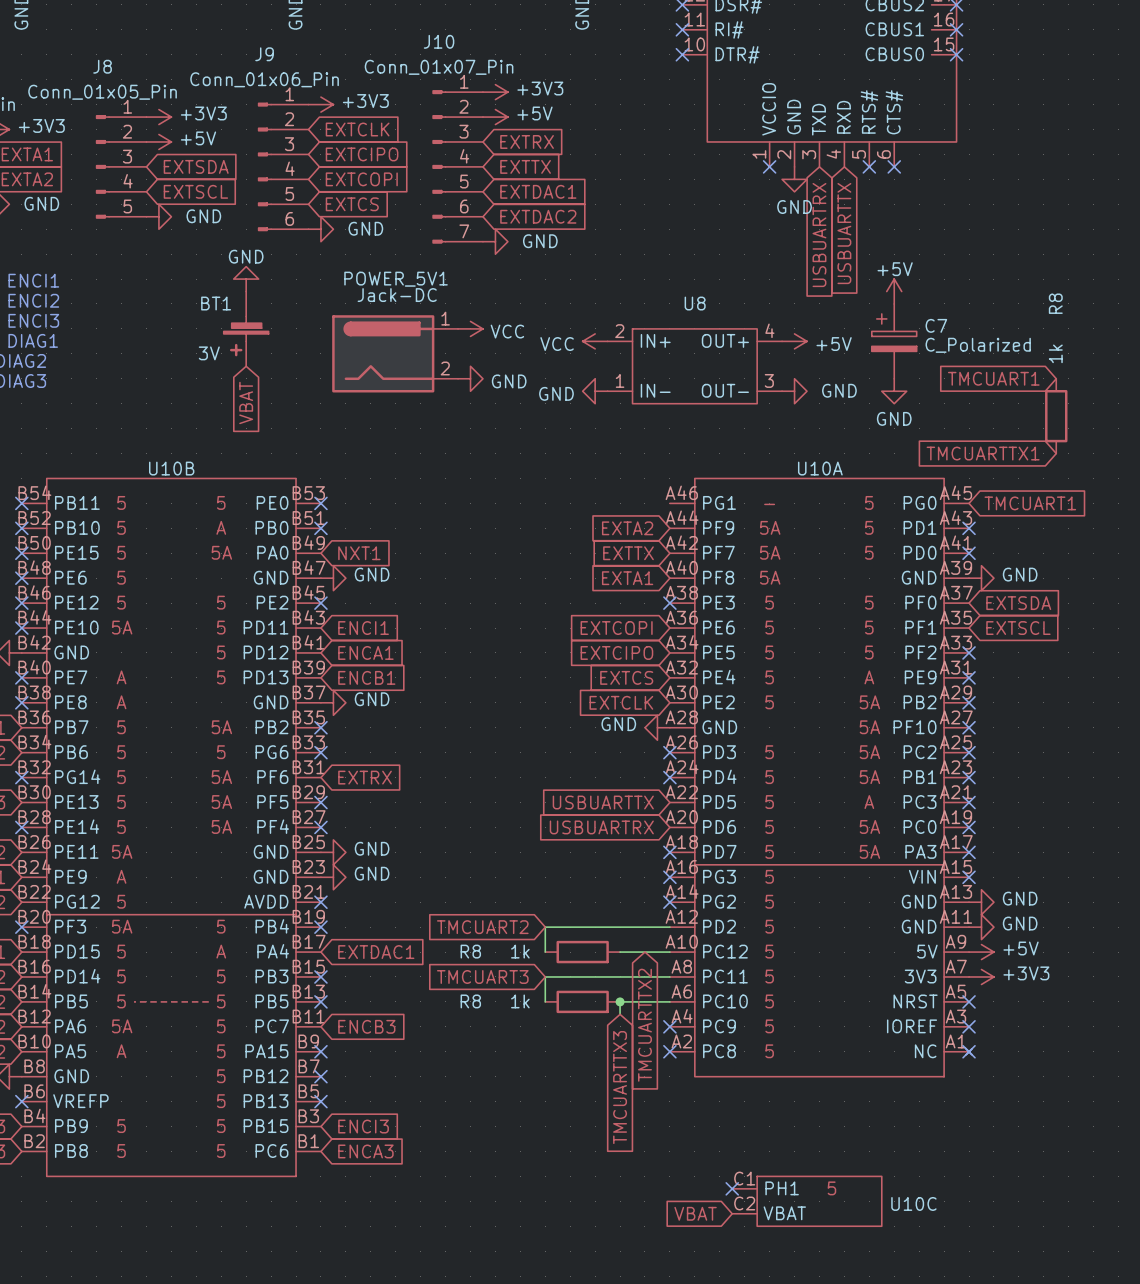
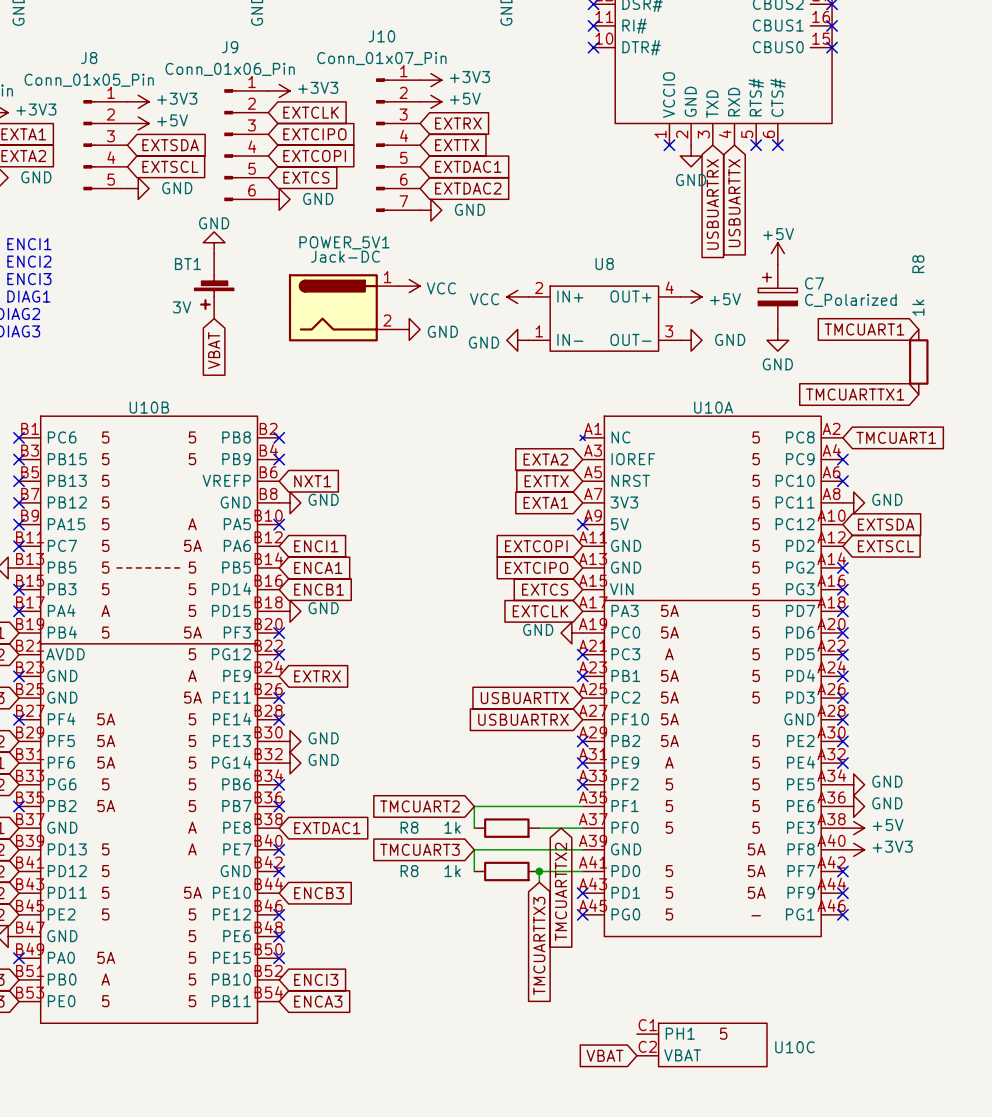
U10A rotation: 0° (833, 777) -> 180° (700, 676)
U10B rotation: 0° (171, 827) -> 180° (149, 719)
no-connect mark: (732, 1188) -> none

